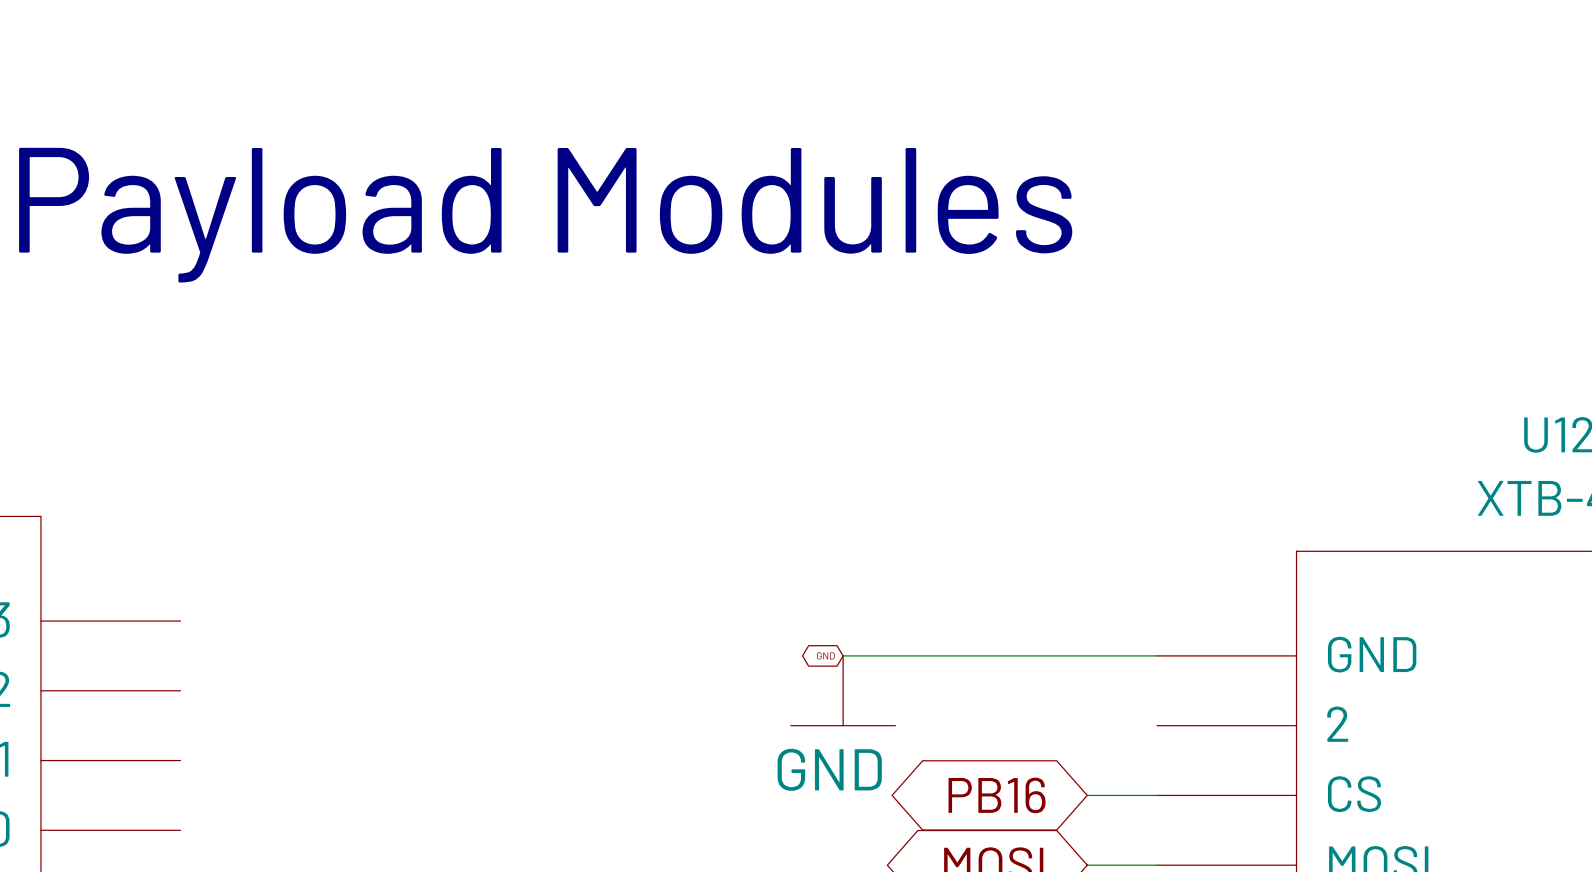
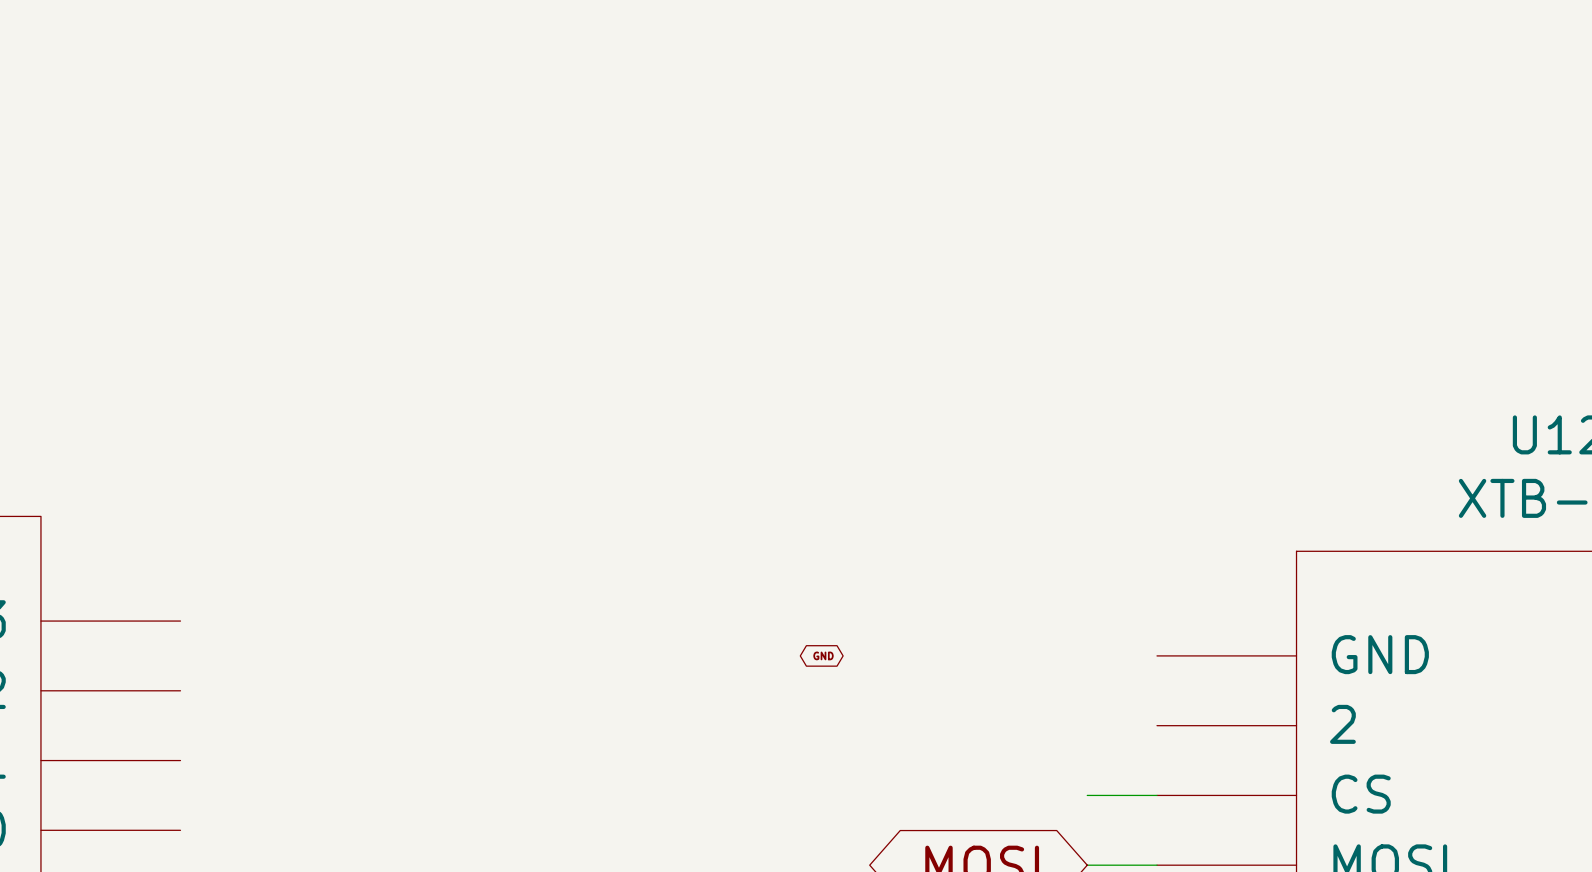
text: Payload Modules (545, 215) -> none
wire: (843, 655) (1157, 655) -> none
power symbol: GND (843, 690) -> none
global label: PB16 (997, 795) -> none

